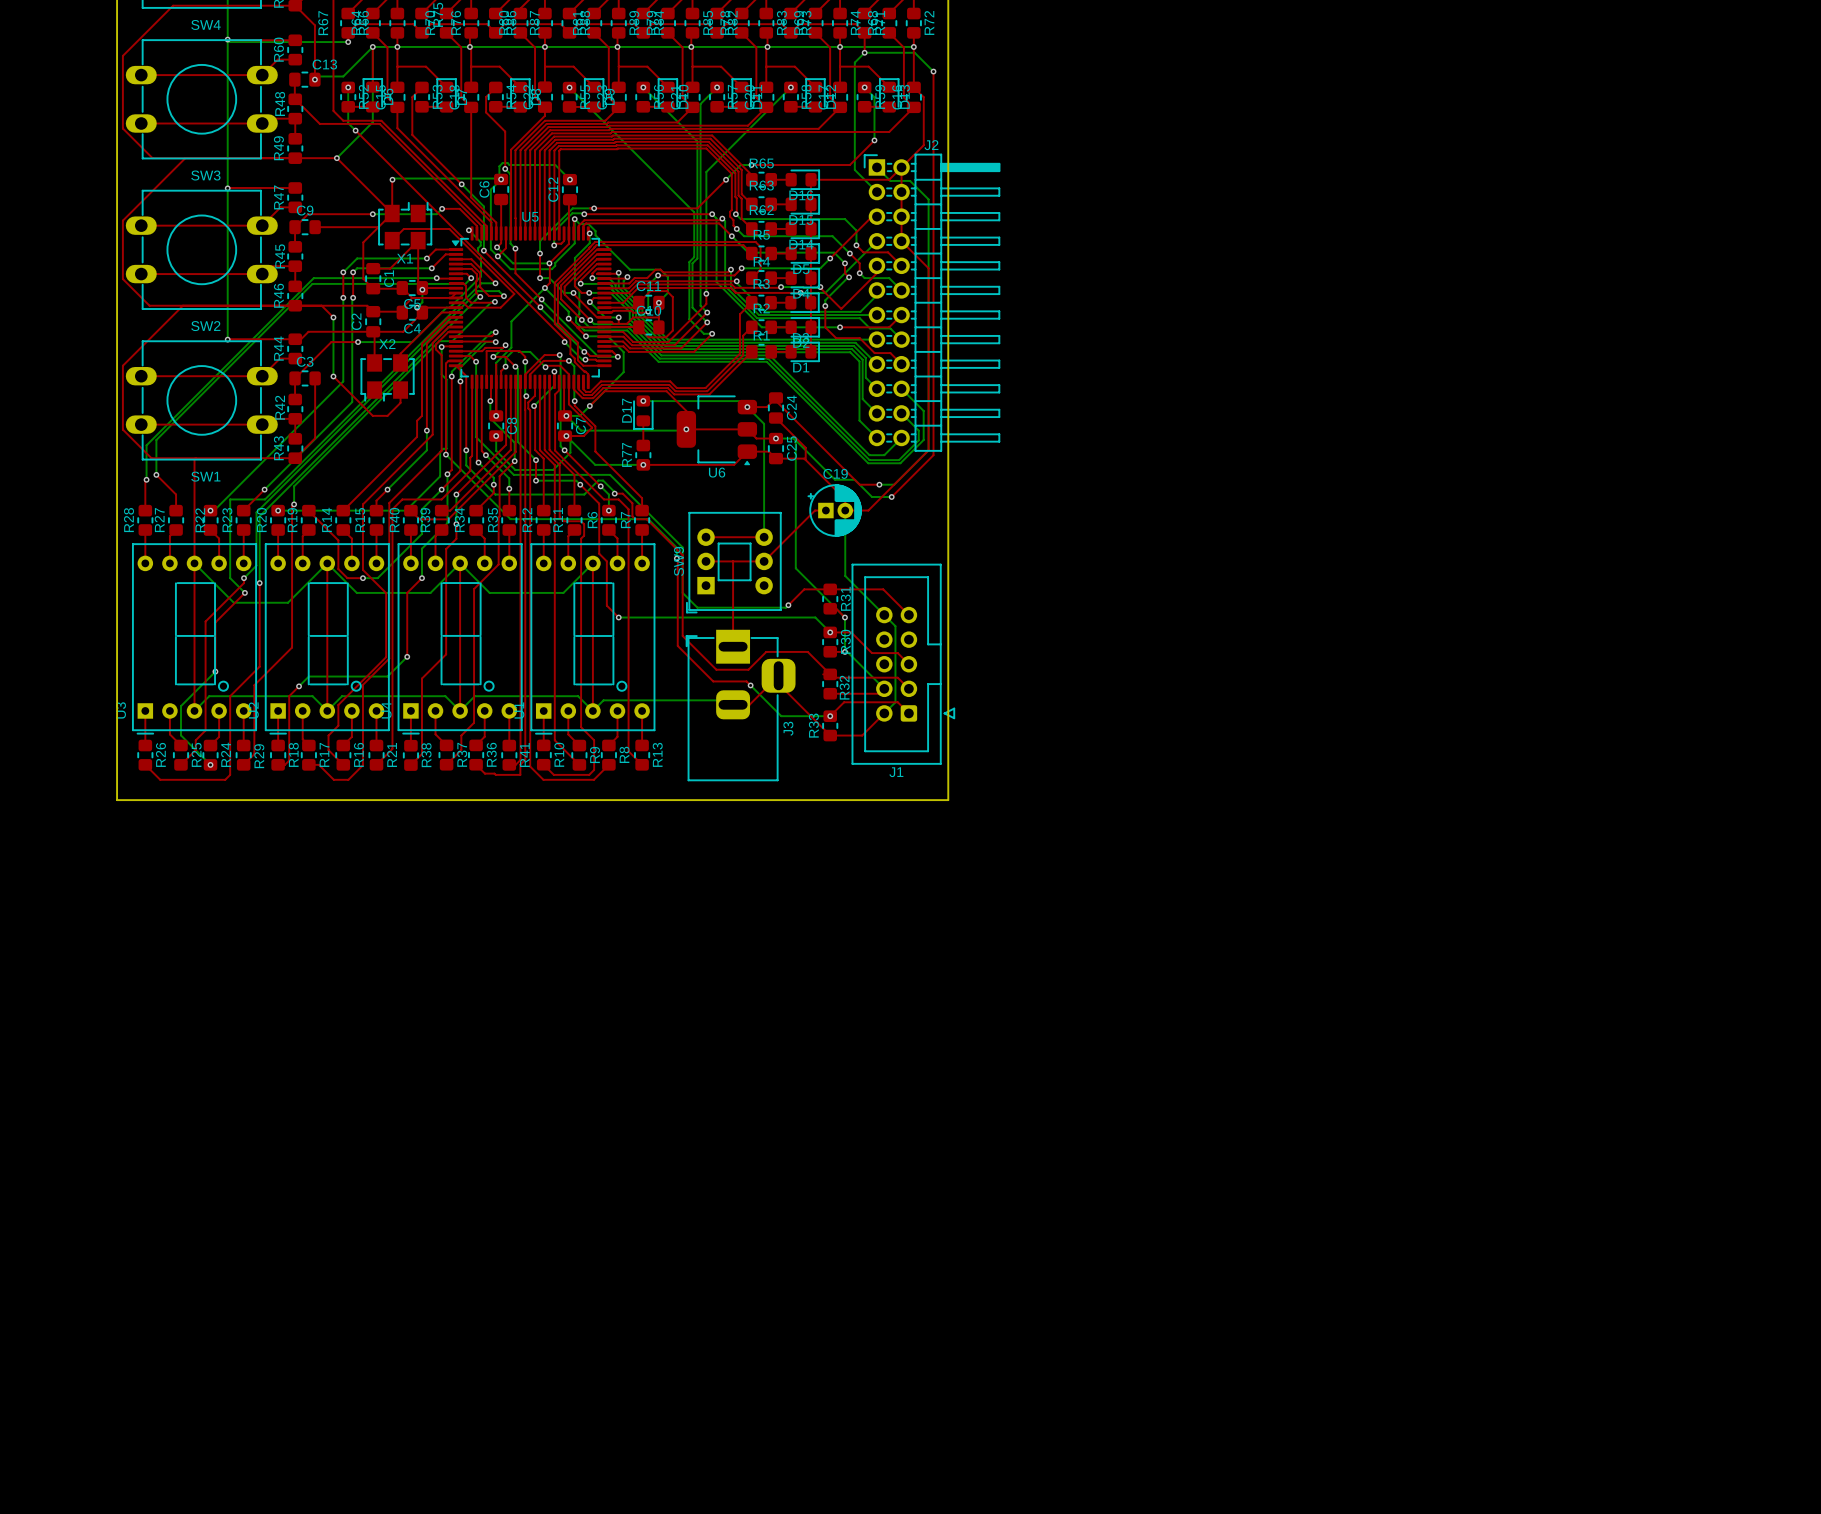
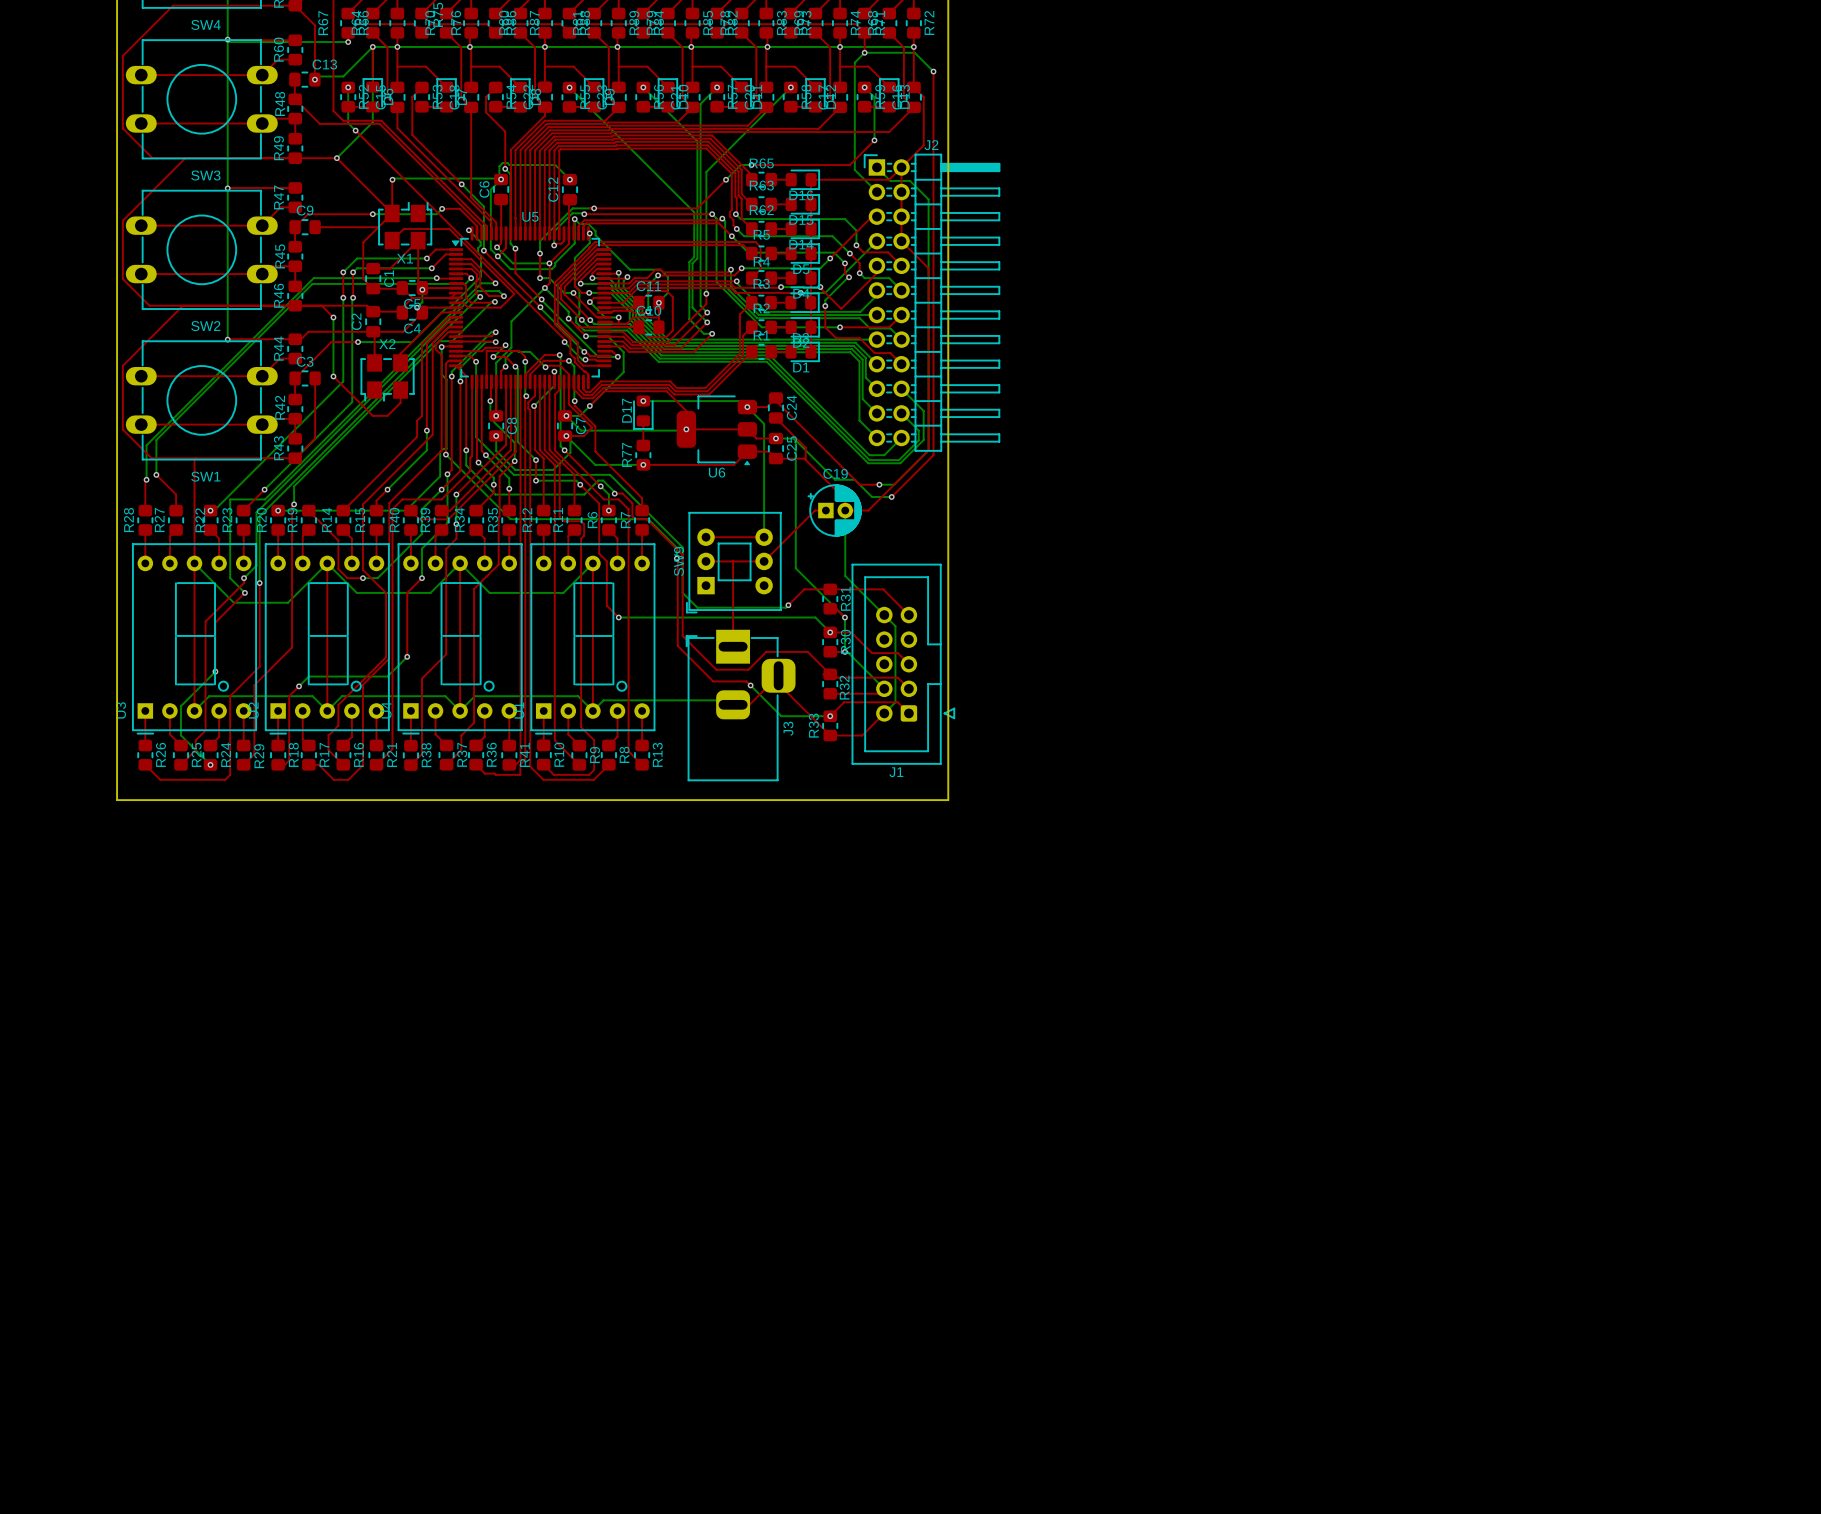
top track: (496, 364) (496, 415) -> none

